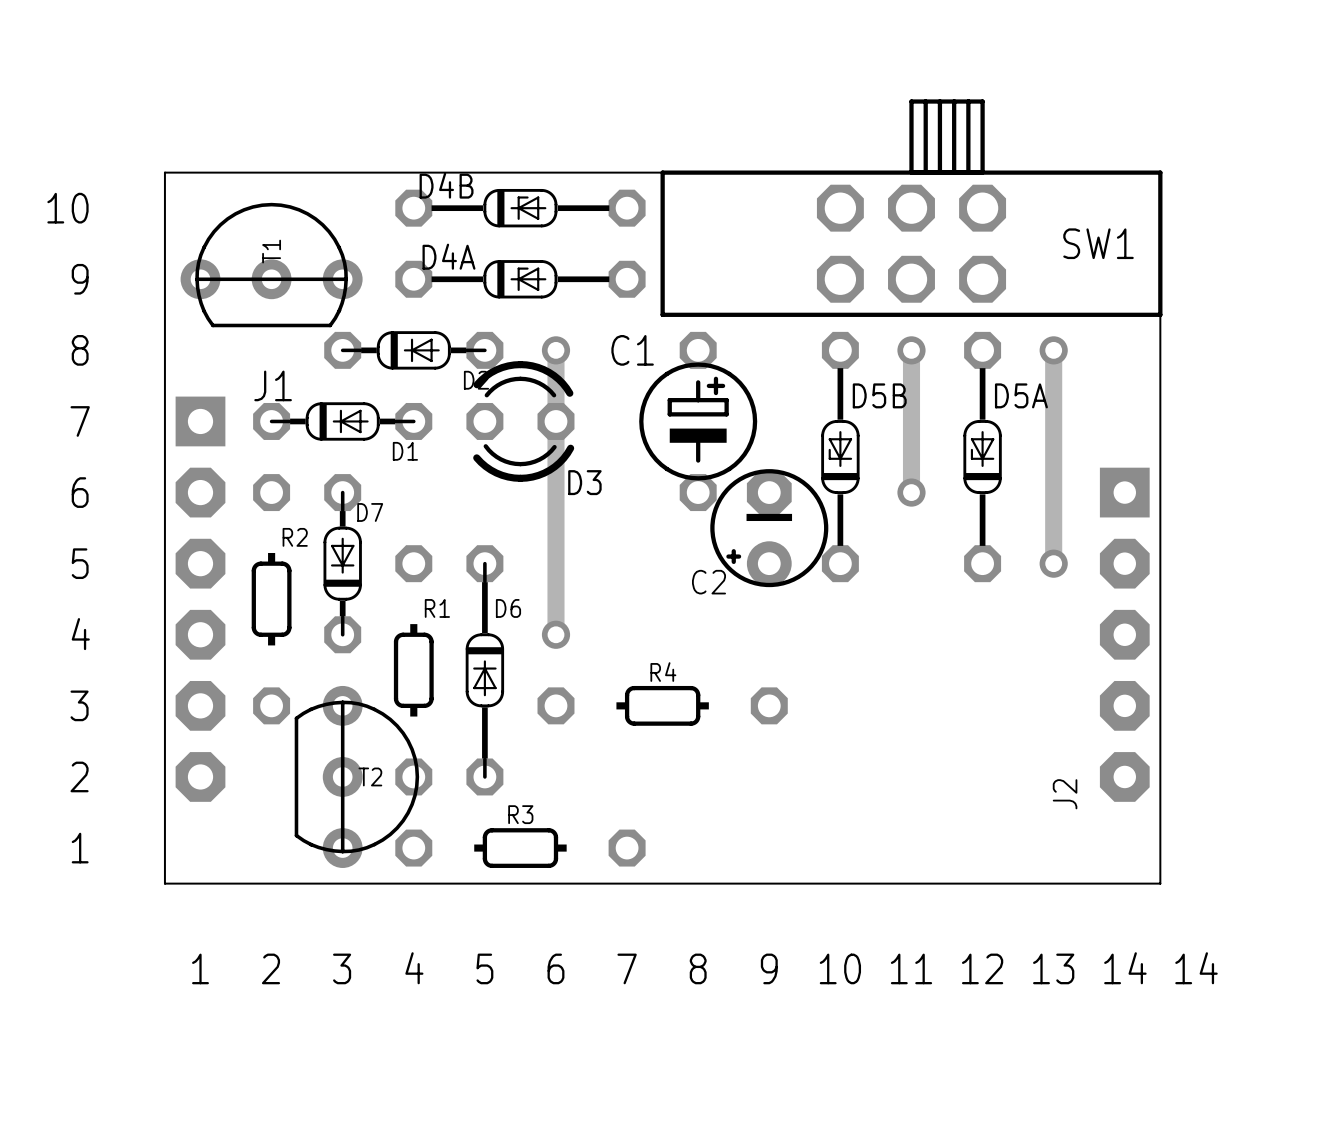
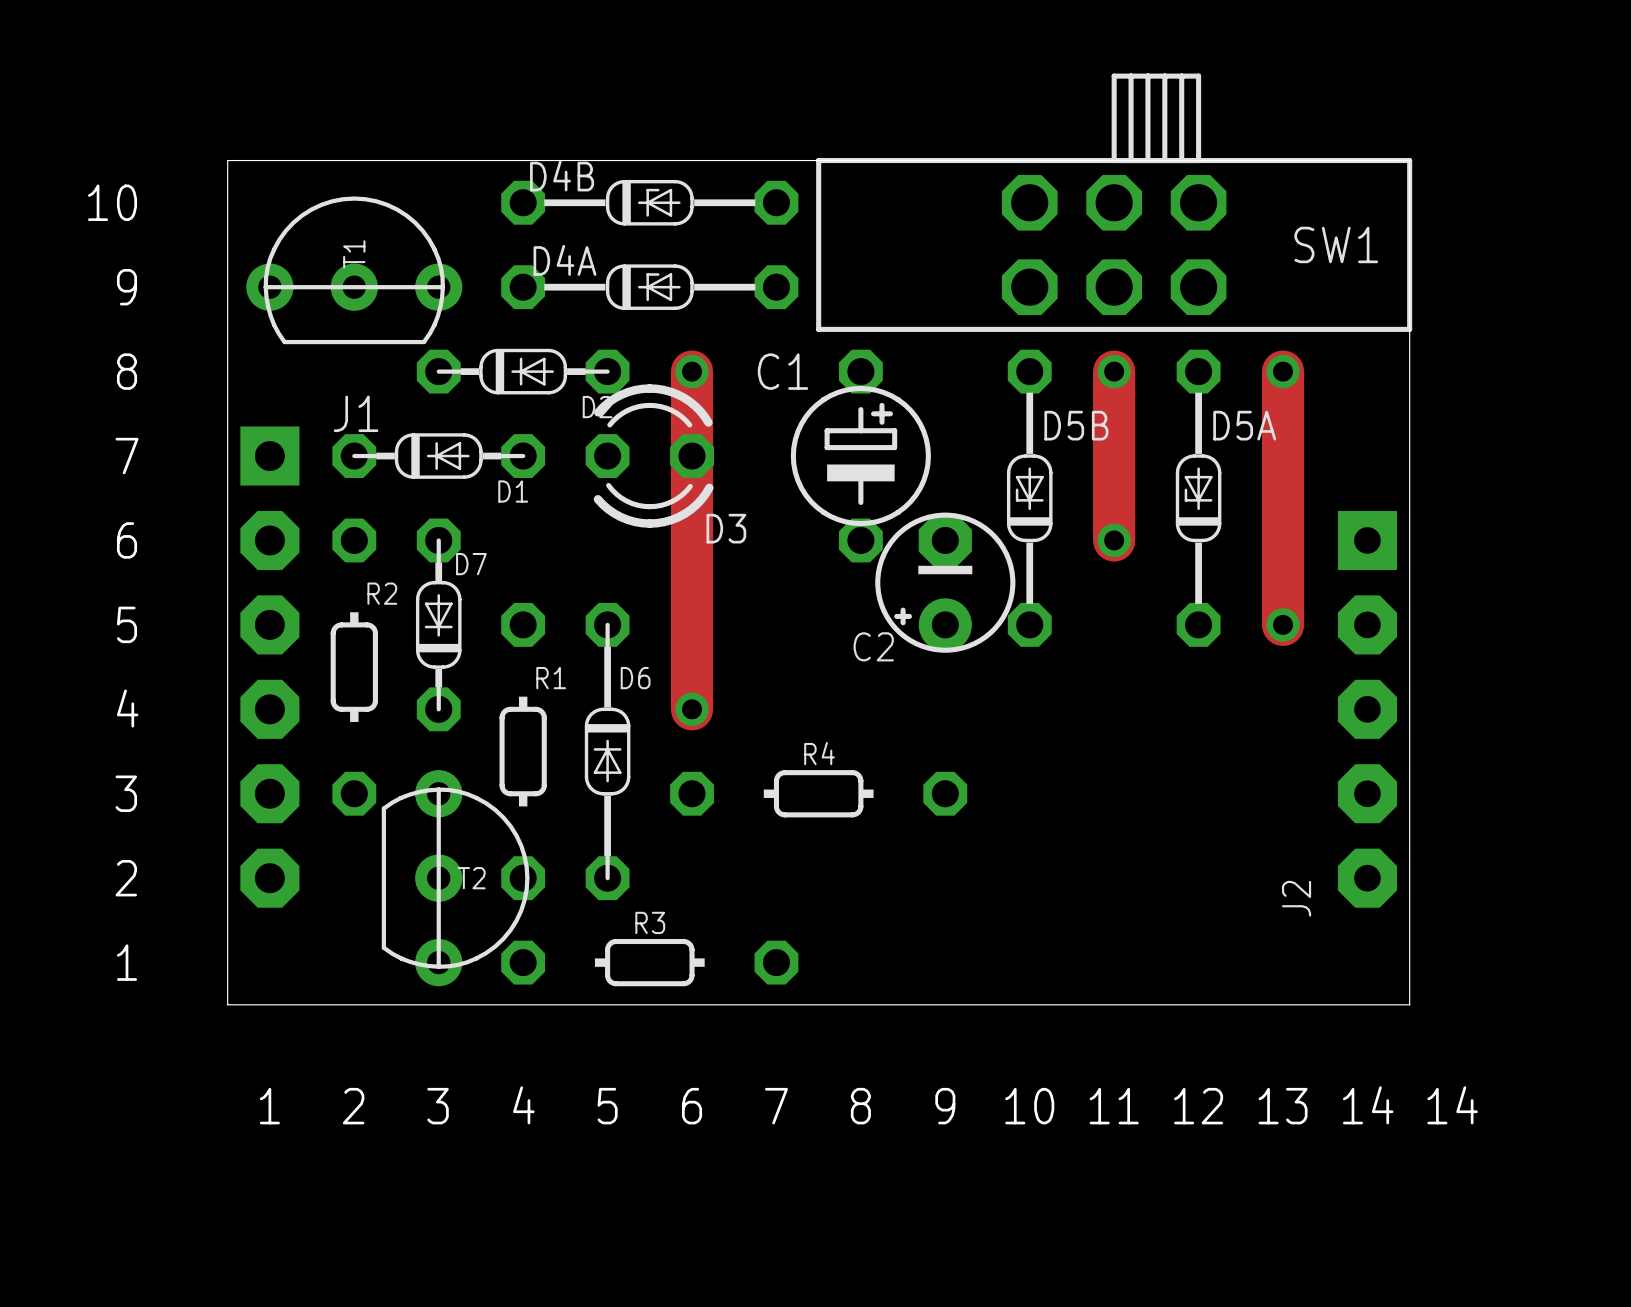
track width: thin (555, 350) (555, 634) -> thick (692, 371) (692, 709)
track width: thin (911, 350) (911, 492) -> thick (1114, 371) (1114, 540)
track width: thin (1053, 350) (1053, 563) -> thick (1283, 371) (1283, 624)

